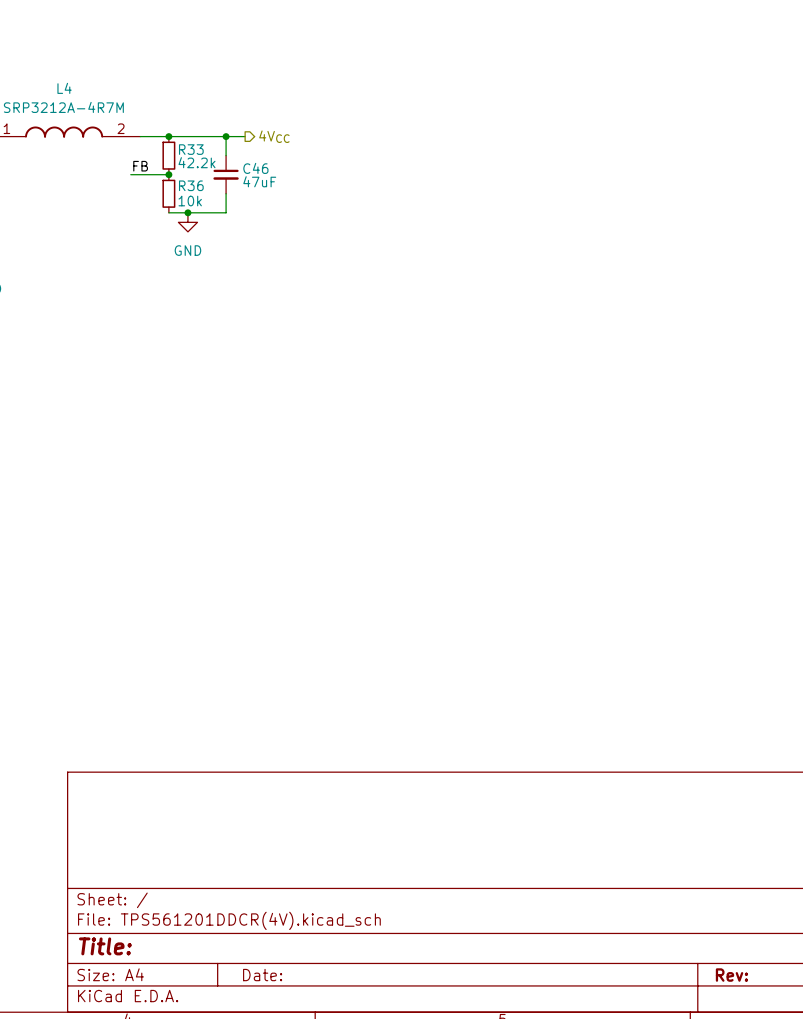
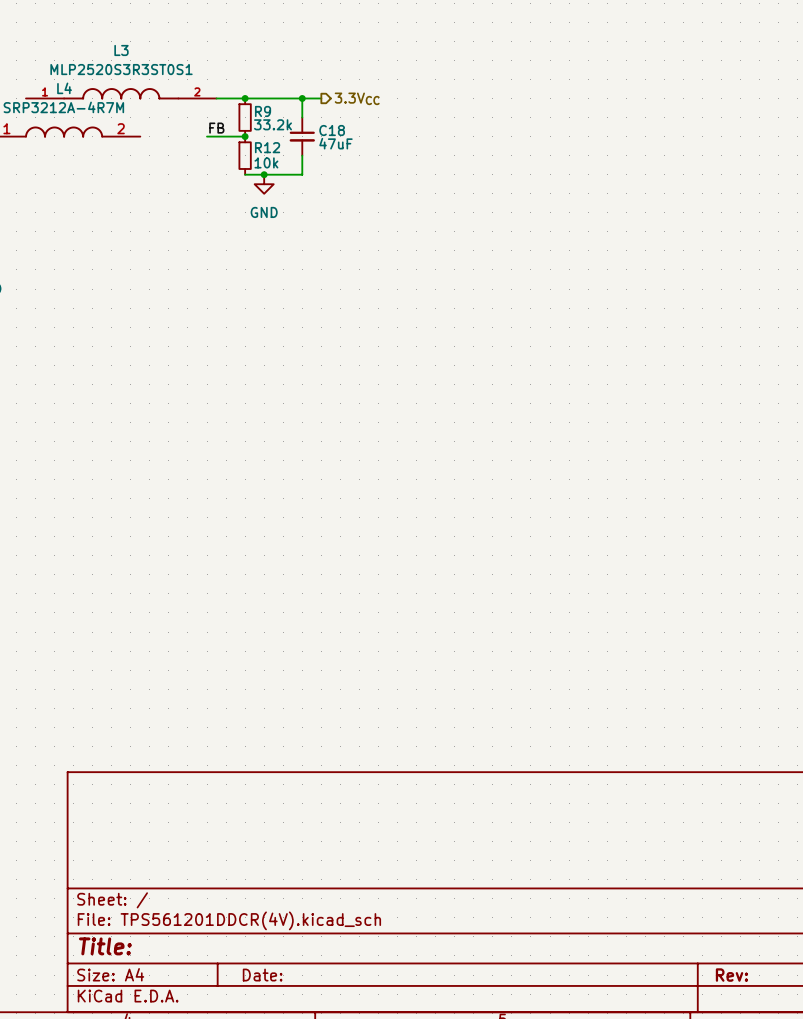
L3: none -> MLP2520S3R3ST0S1 (121, 93)
wire: none -> (216, 98) (321, 98)
junction: none -> (245, 98)
junction: none -> (302, 98)
hierarchical label: none -> 3.3VCC (357, 98)
R9: none -> 33.2k (245, 117)
wire: (140, 136) (207, 136) -> none
junction: (168, 136) -> none
wire: (226, 136) (226, 155) -> (302, 98) (302, 117)
junction position: (226, 136) -> (245, 136)
hierarchical label: 4VCC (274, 136) -> none
C18: none -> 47uF (302, 136)
R33: 42.2k (168, 155) -> none
R12: none -> 10k (245, 155)
label position: FB (140, 166) -> FB (216, 128)
wire: (130, 174) (168, 174) -> none
junction: (168, 174) -> none
C46: 47uF (226, 174) -> none
junction: none -> (264, 174)
R36: 10k (168, 193) -> none
wire: (226, 193) (226, 212) (168, 212) -> (302, 155) (302, 174) (245, 174)
junction: (187, 212) -> none
power symbol position: GND (187, 222) -> GND (264, 184)

